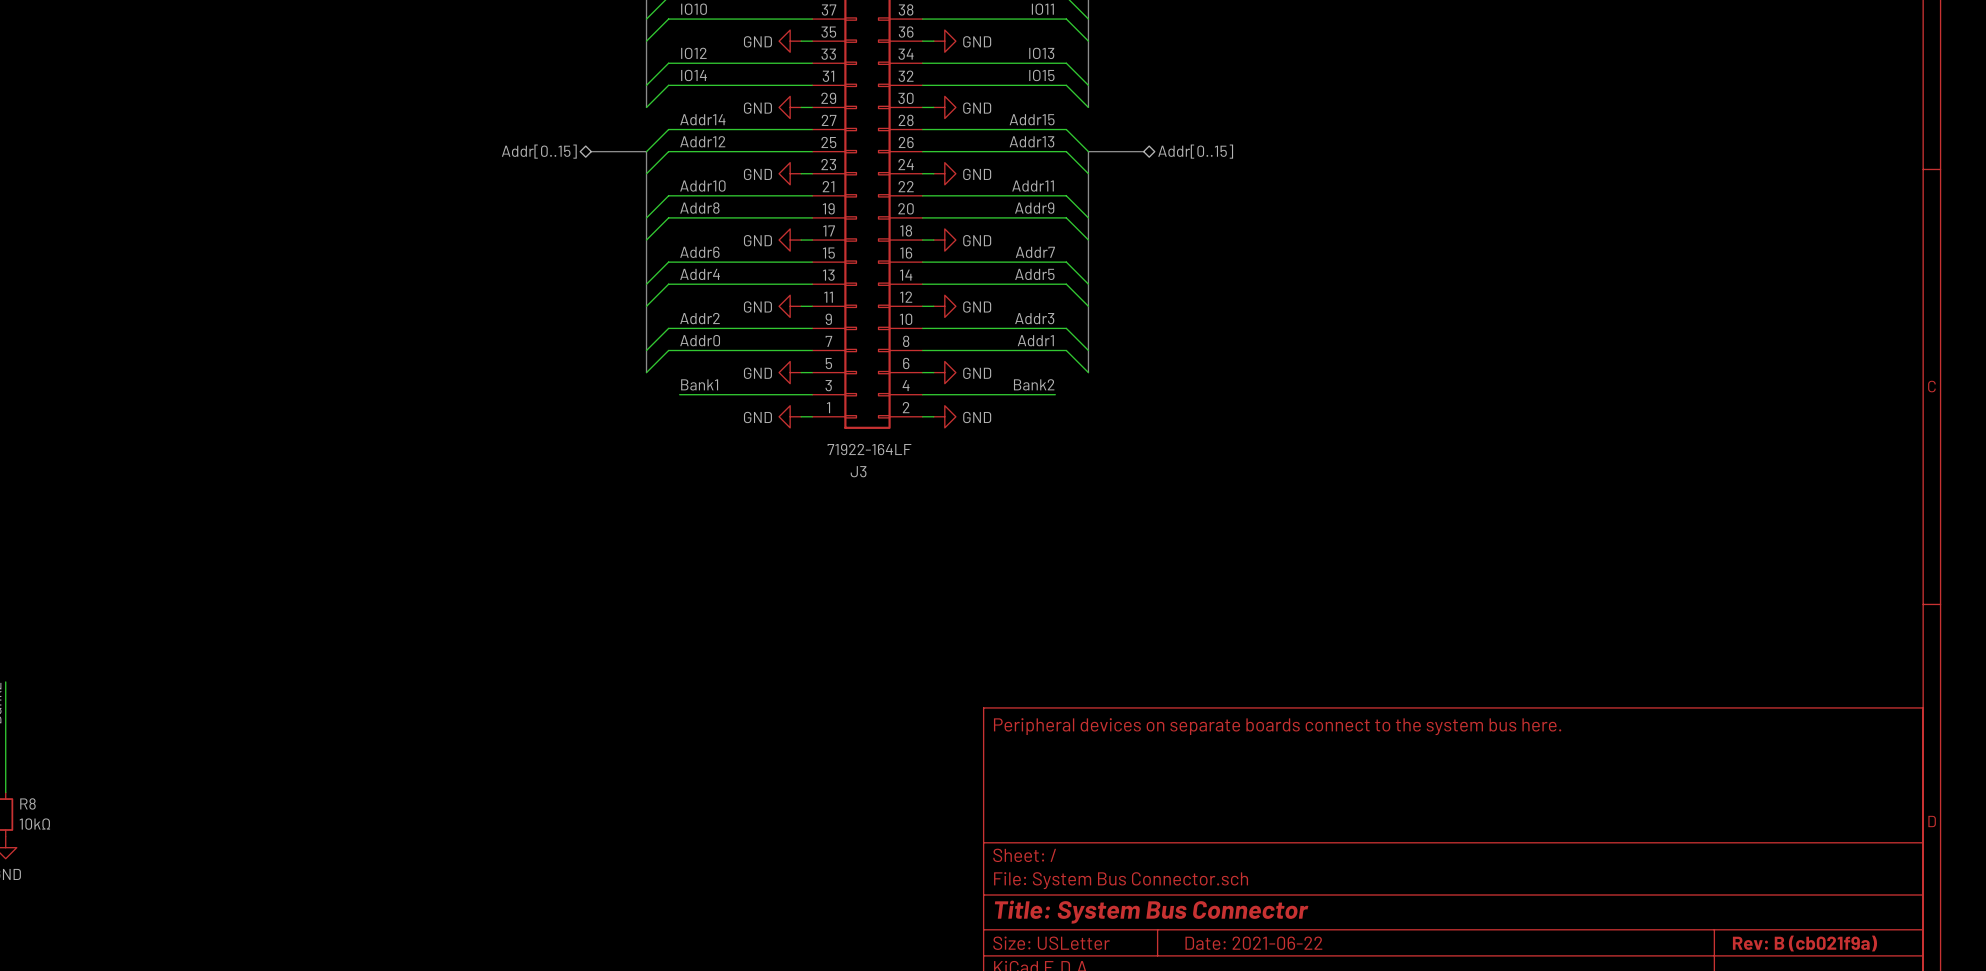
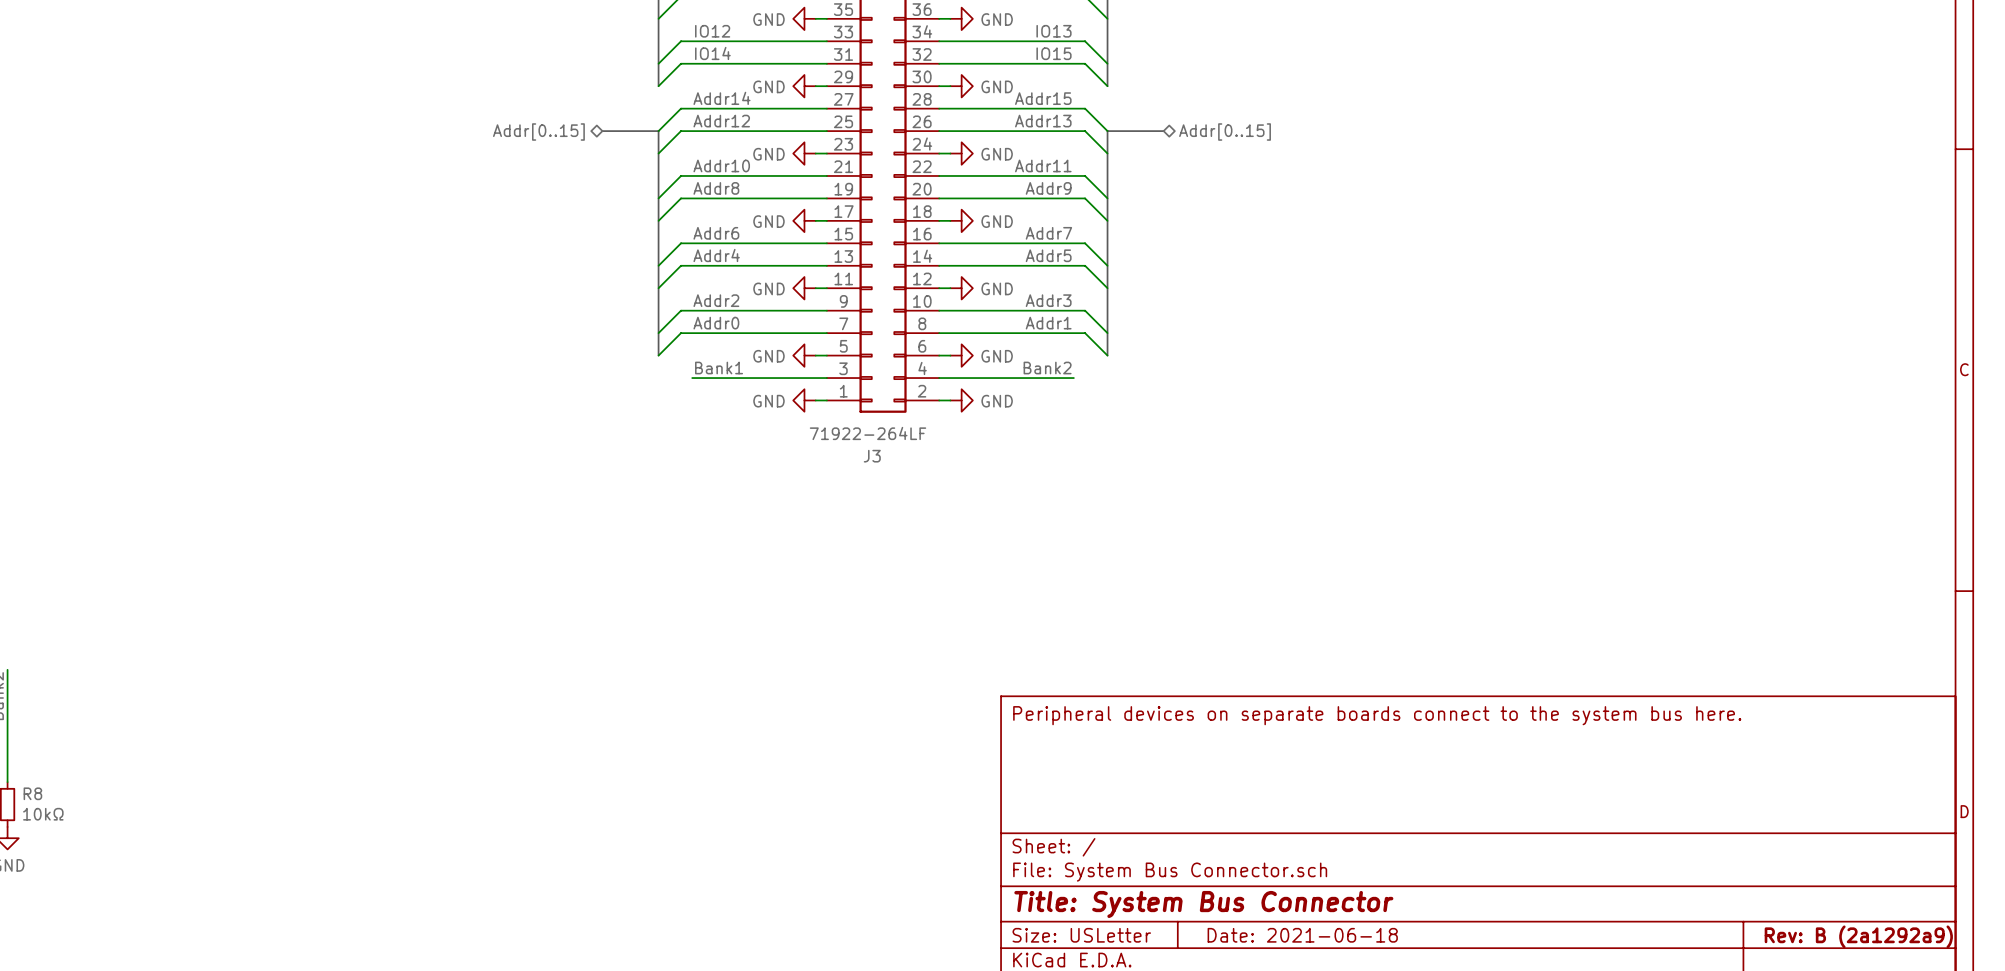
J3 value: 71922-164LF (869, 449) -> 71922-264LF (868, 433)
title block: Date: 2021-06-22 (1253, 943) -> Date: 2021-06-18 (1302, 935)
title block: Rev: B (cb021f9a) (1804, 943) -> Rev: B (2a1292a9) (1858, 936)

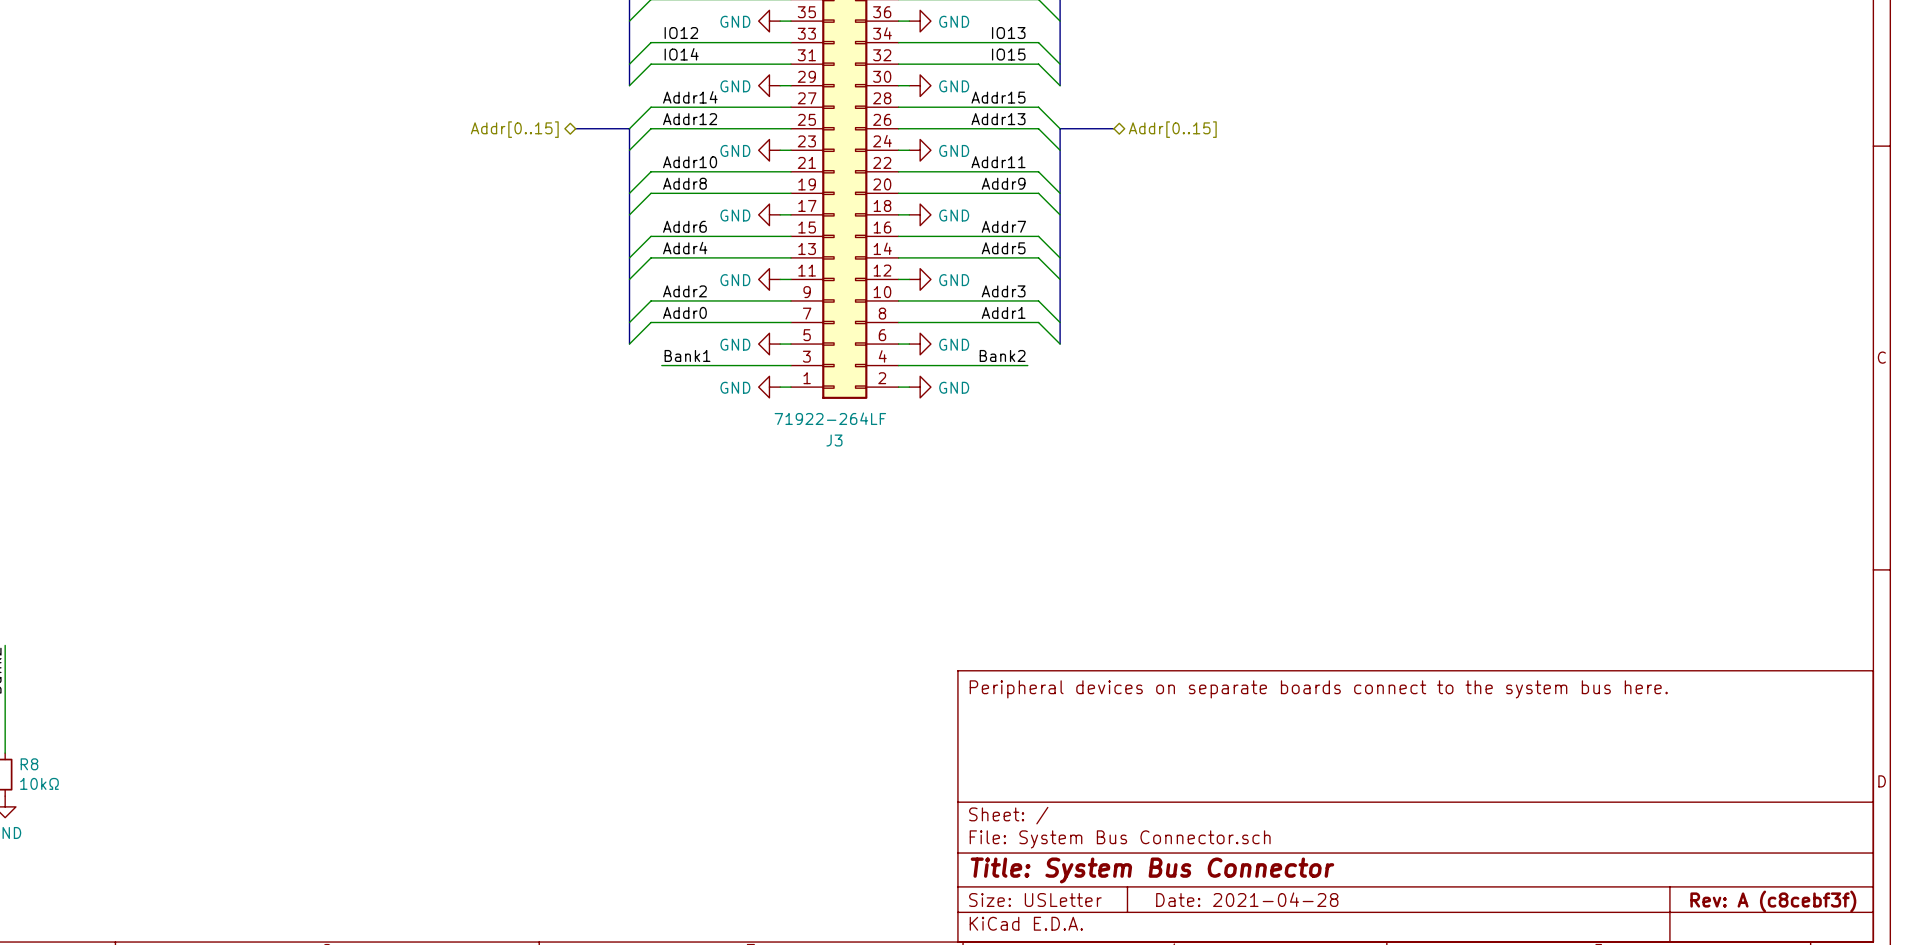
title block: Date: 2021-06-18 (1302, 935) -> Date: 2021-04-28 (1247, 899)
title block: Rev: B (2a1292a9) (1858, 936) -> Rev: A (c8cebf3f) (1773, 901)

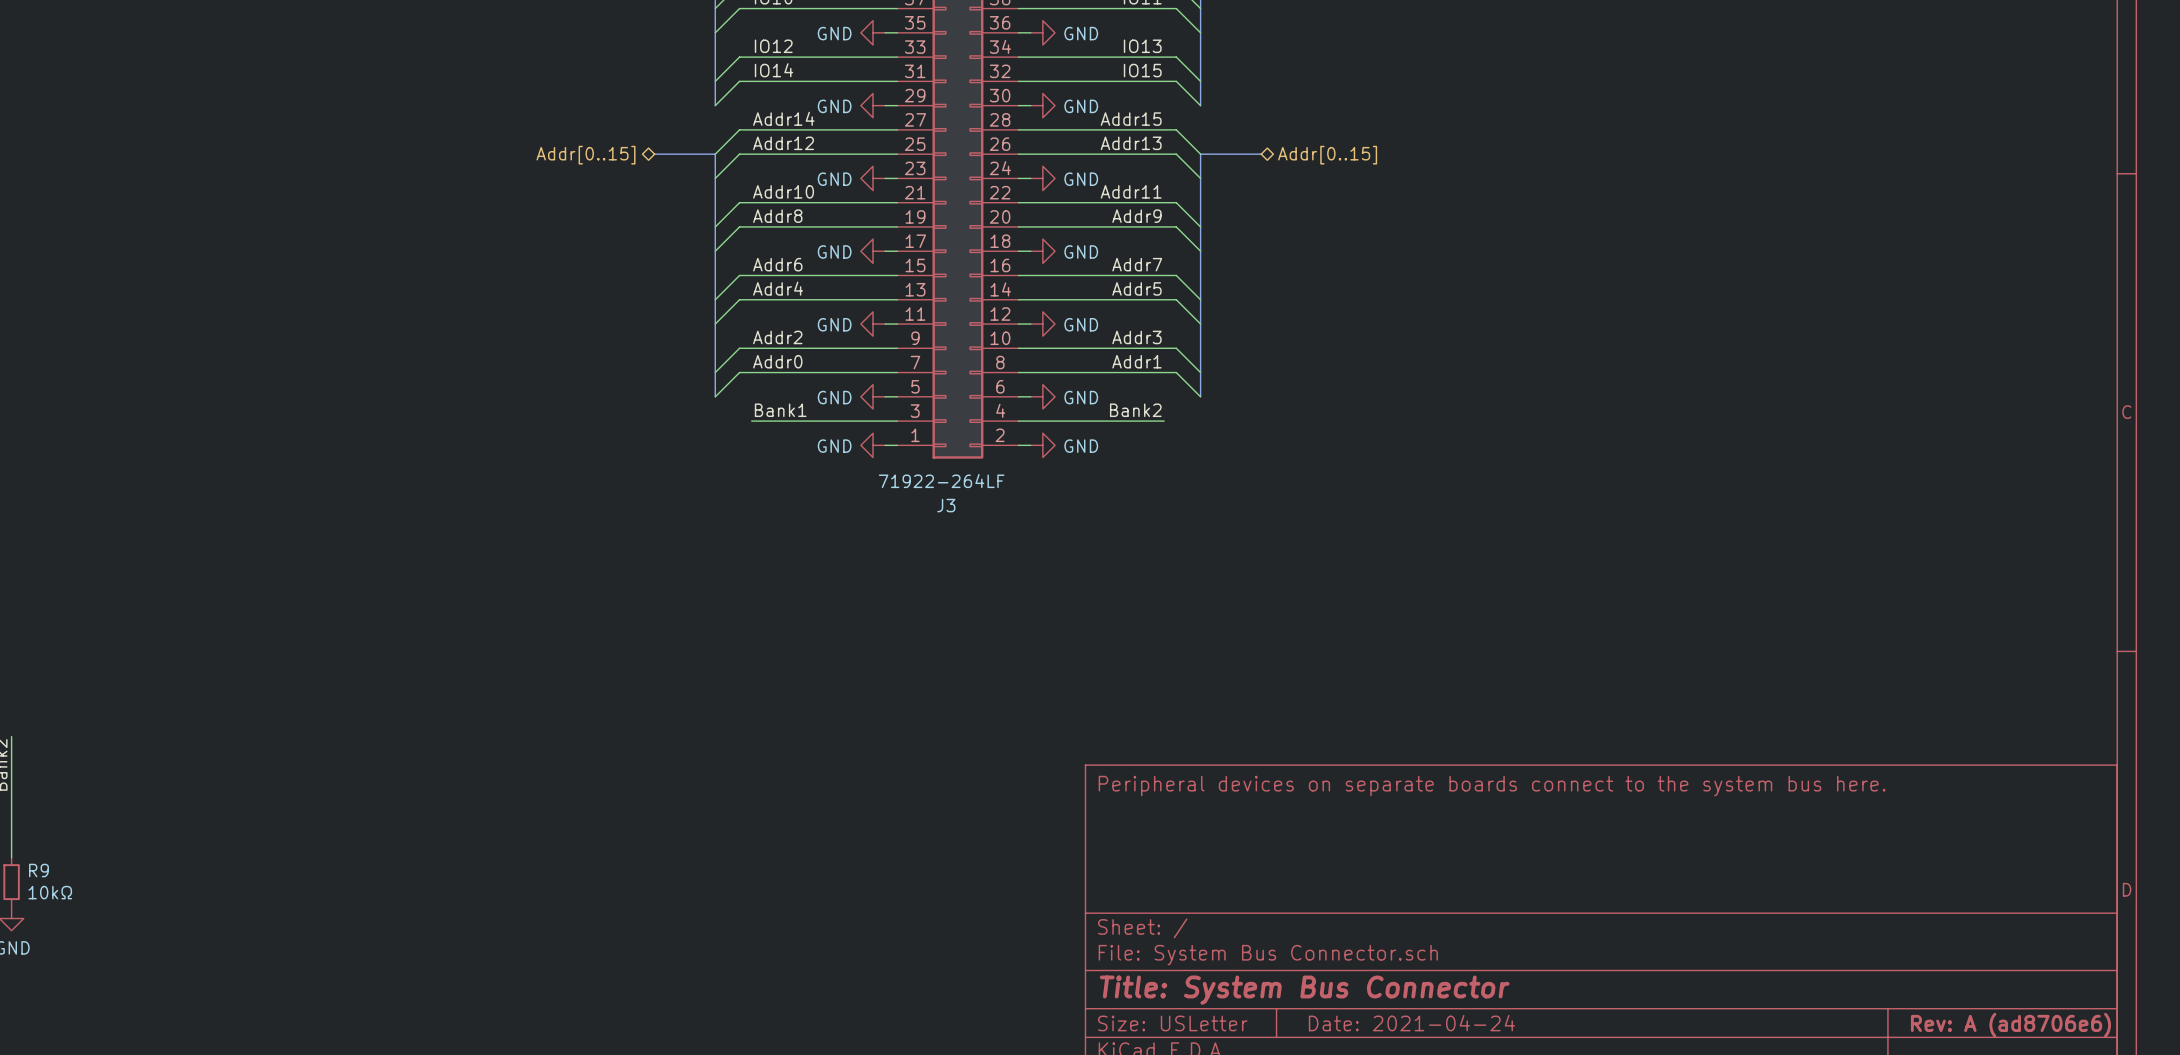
R8 name: R8 (29, 764) -> R9 (39, 870)
title block: Date: 2021-04-28 (1247, 899) -> Date: 2021-04-24 (1411, 1023)
title block: Rev: A (c8cebf3f) (1773, 901) -> Rev: A (ad8706e6) (2010, 1025)

